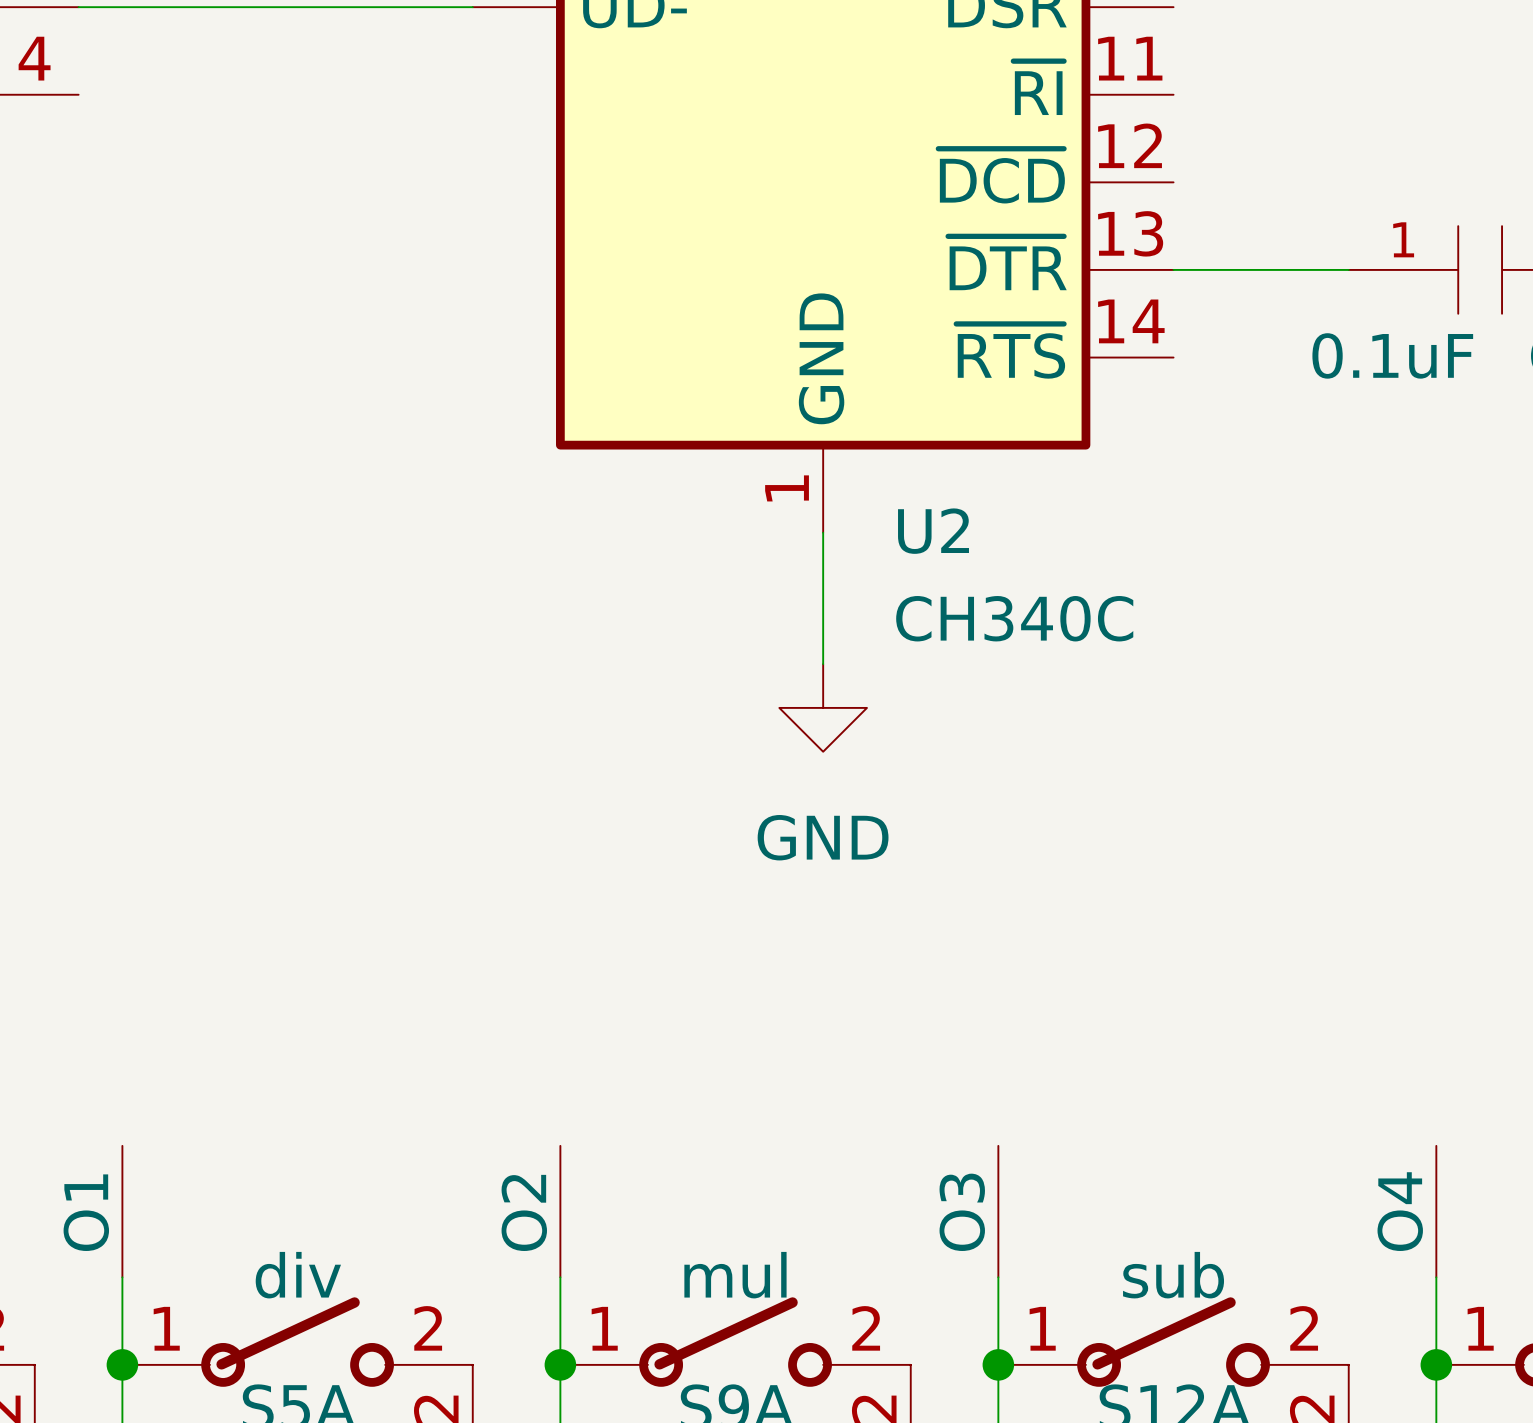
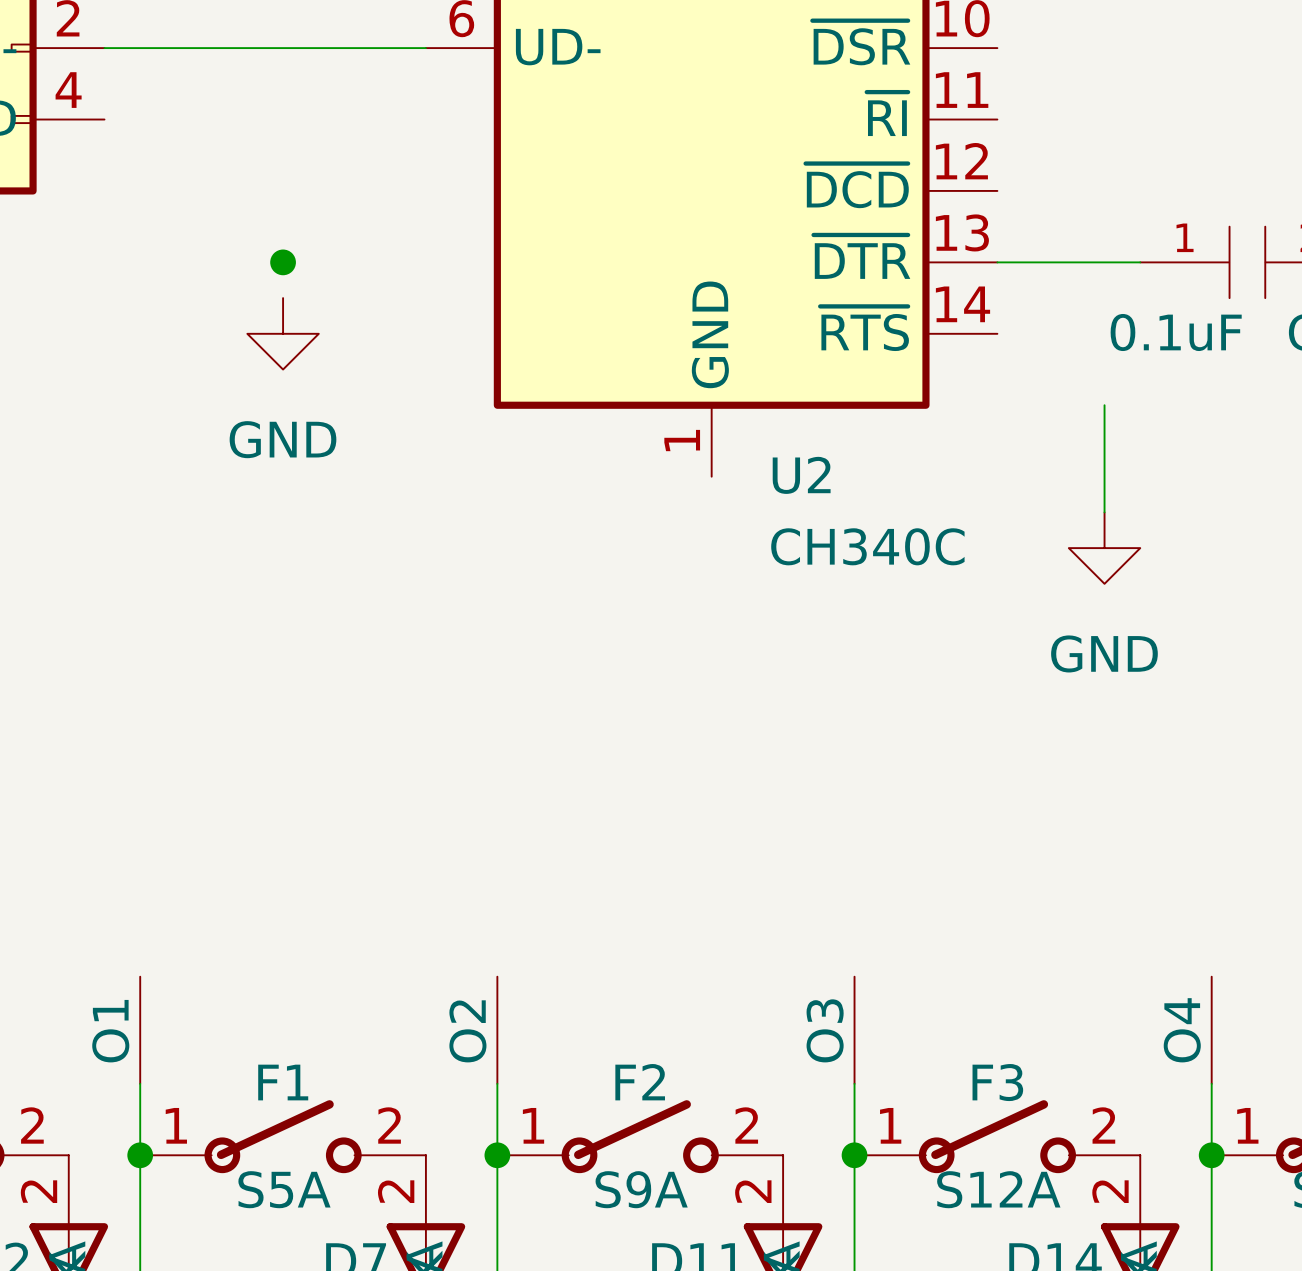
junction: none -> (283, 262)
power symbol: none -> GND (283, 333)
wire: (823, 532) (823, 664) -> (1104, 405) (1104, 512)
power symbol: none -> GND (1104, 548)
power symbol: GND (823, 707) -> none
S5A value: div (298, 1275) -> F1 (283, 1082)
S9A value: mul (735, 1275) -> F2 (640, 1082)
S12A value: sub (1173, 1275) -> F3 (997, 1082)

